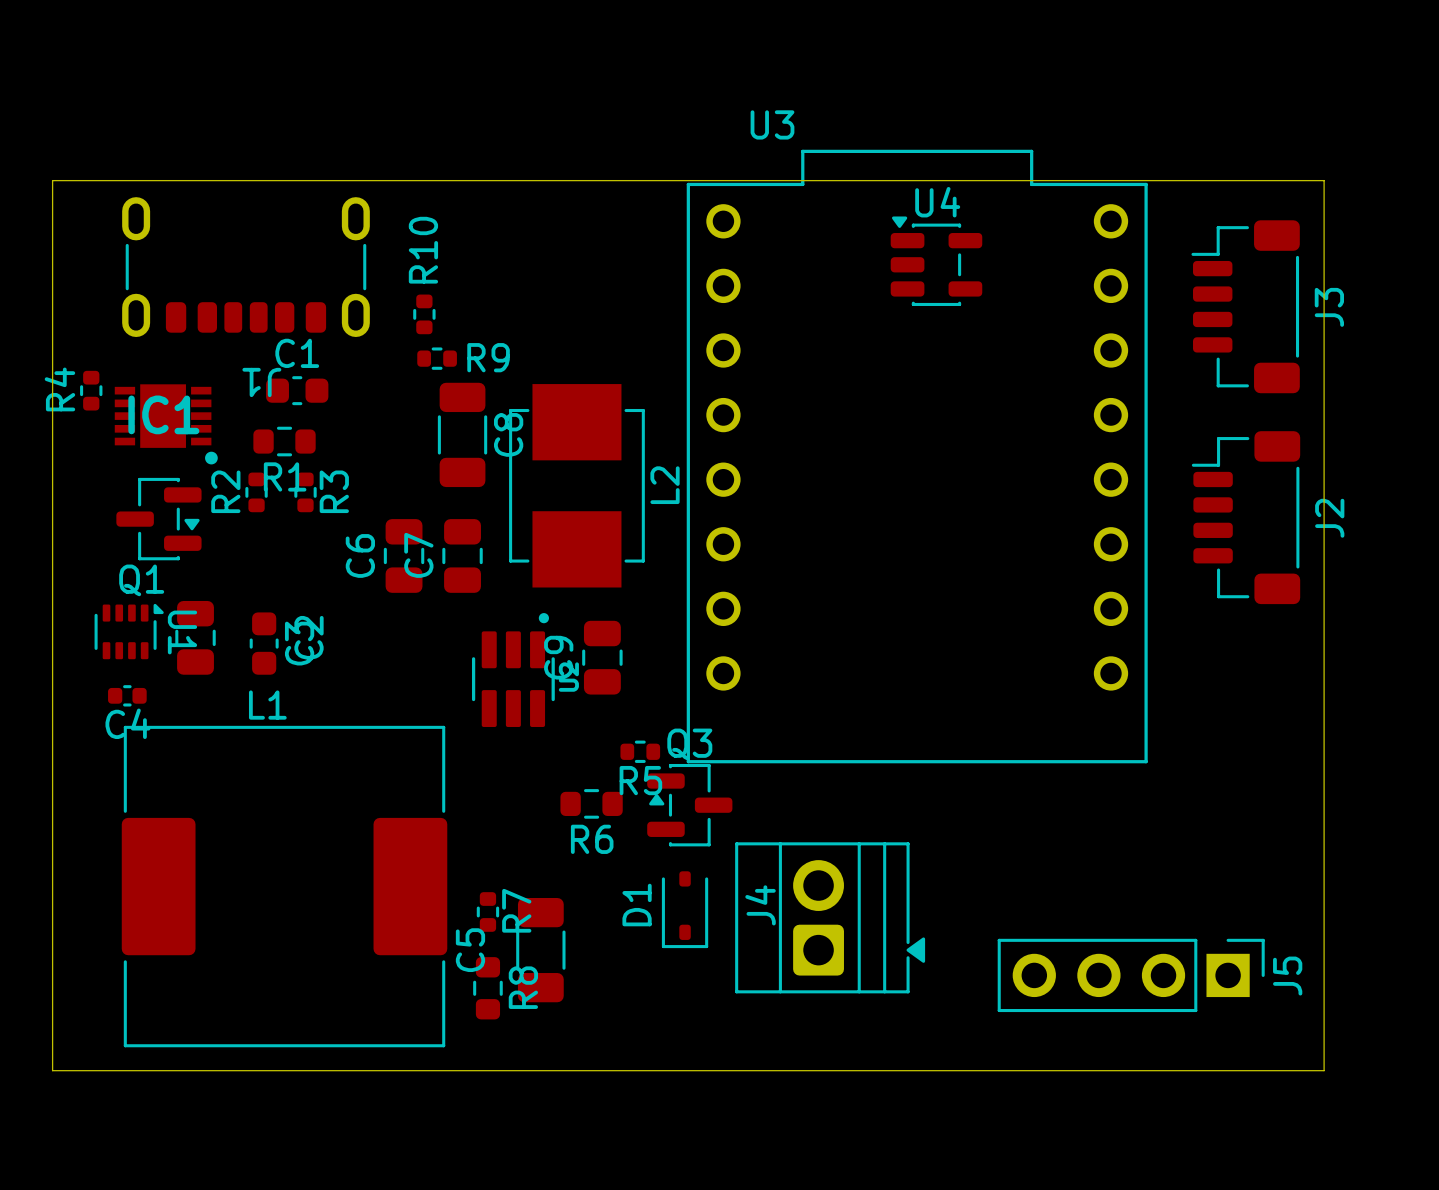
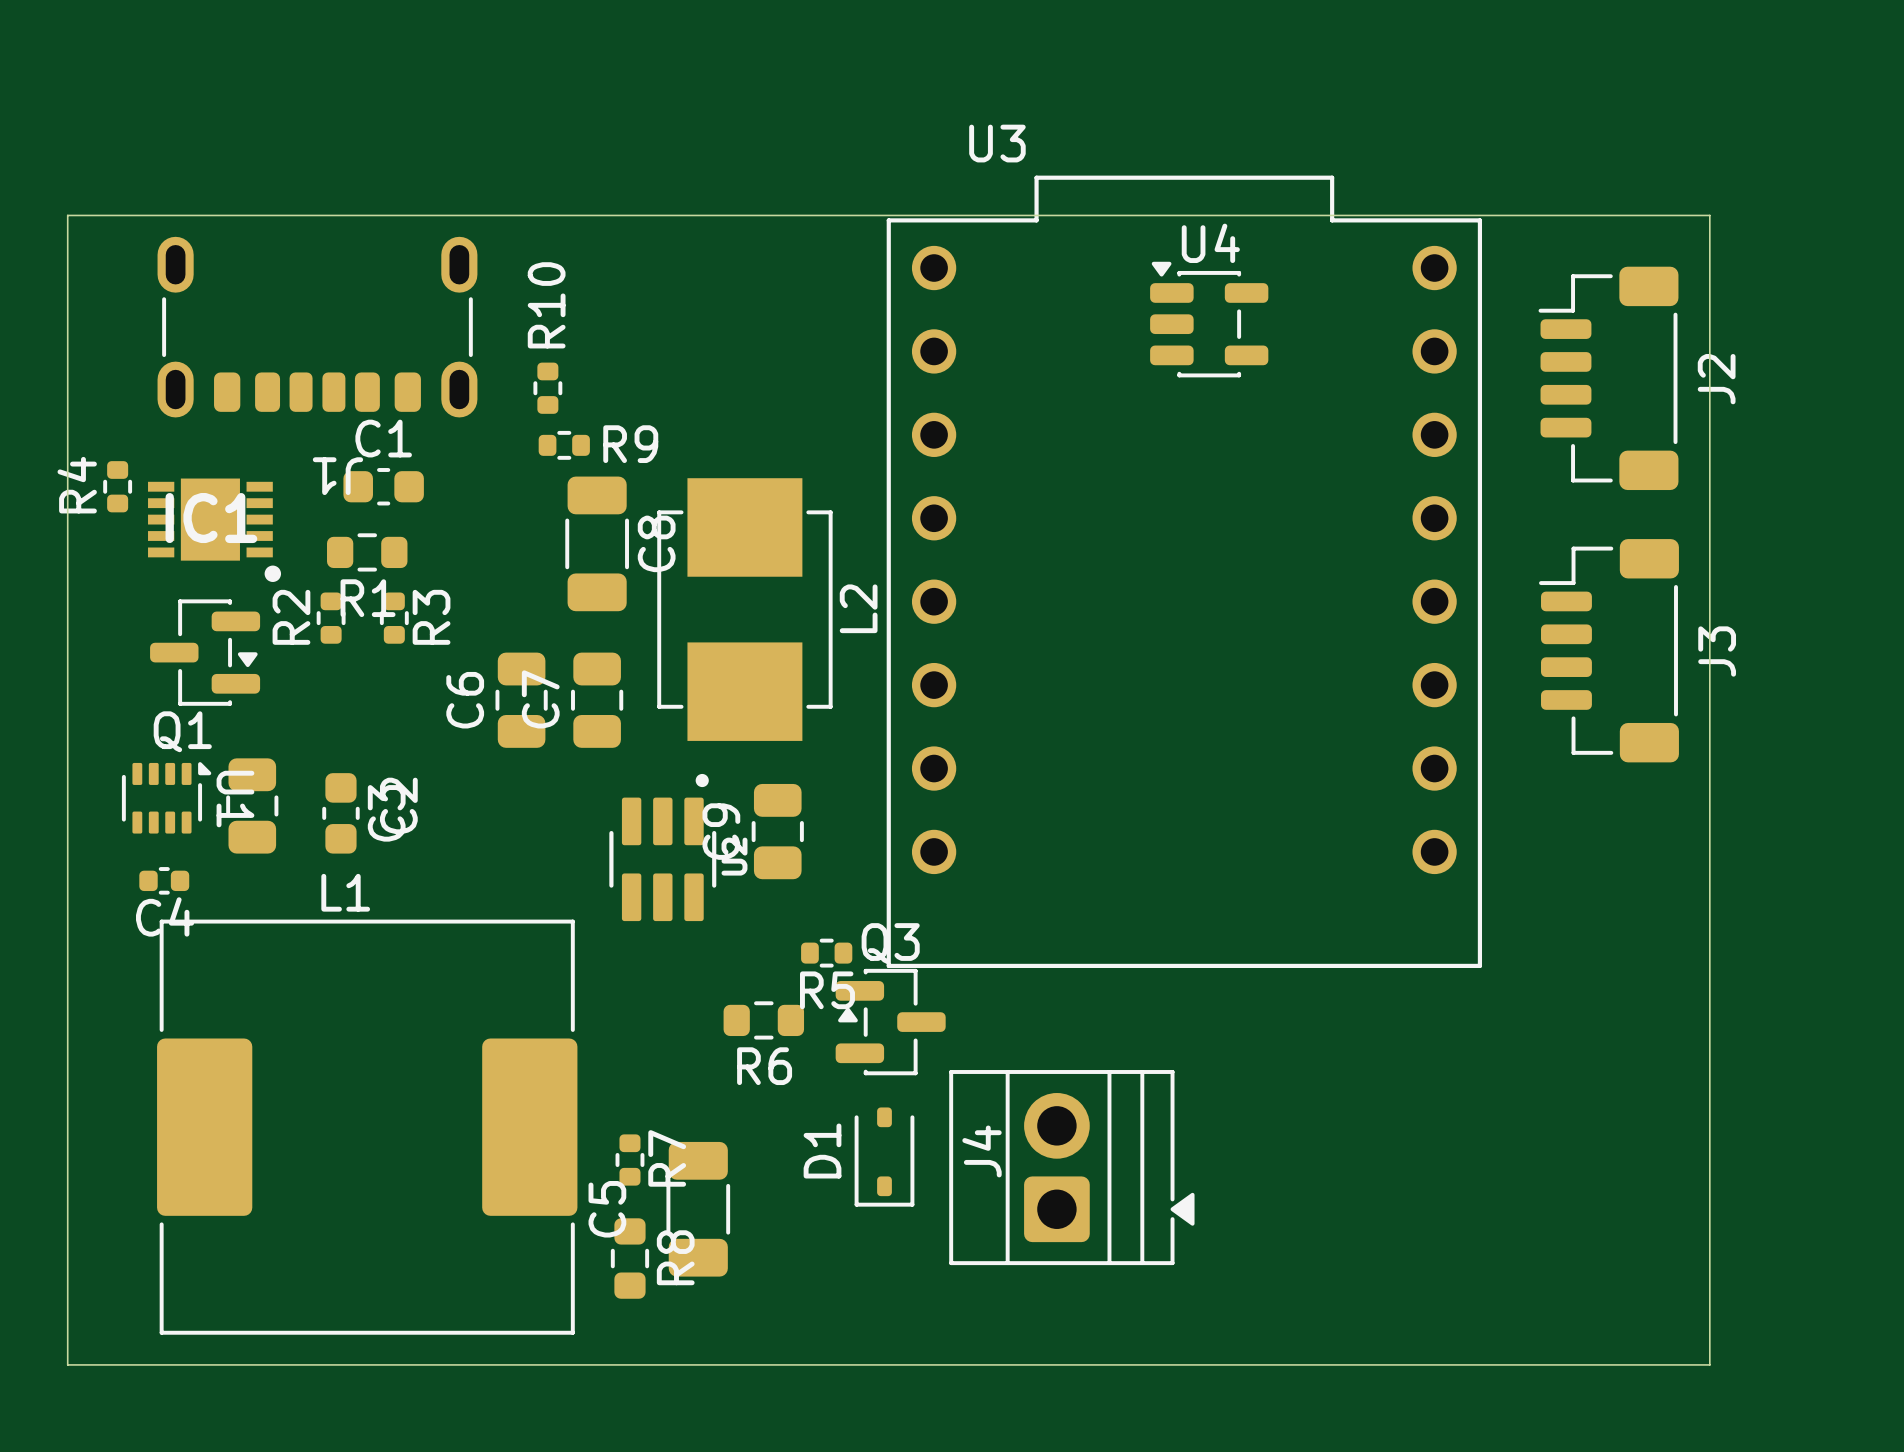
J3 name: J3 (1329, 307) -> J2 (1716, 379)
J2 name: J2 (1329, 518) -> J3 (1717, 651)
J5: (1131, 975) -> none

